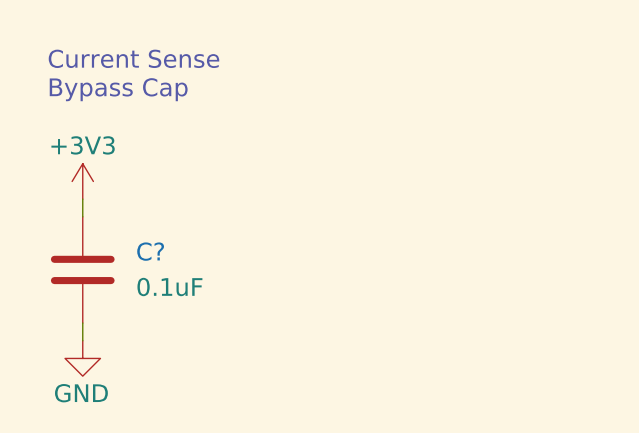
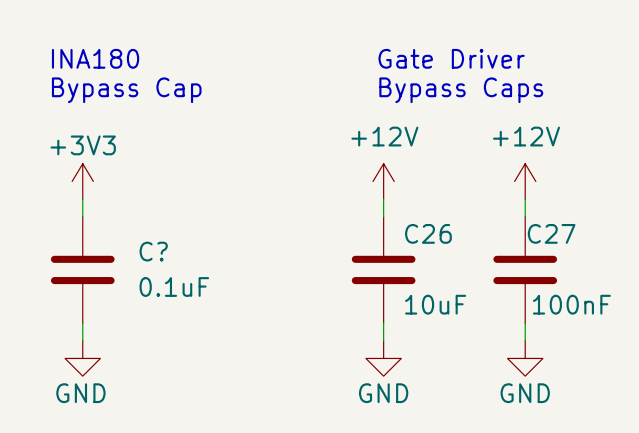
text: Current Sense (133, 58) -> INA180 (95, 58)
text: none -> Gate Driver (451, 58)
text: none -> Bypass Caps (461, 90)
power symbol: none -> +12V (383, 181)
power symbol: none -> +12V (525, 181)
wire: none -> (383, 199) (383, 216)
wire: none -> (525, 199) (525, 216)
C26: none -> 10uF (383, 269)
C27: none -> 100nF (525, 269)
wire: none -> (383, 323) (383, 340)
wire: none -> (525, 323) (525, 340)
power symbol: none -> GND (383, 358)
power symbol: none -> GND (525, 358)

